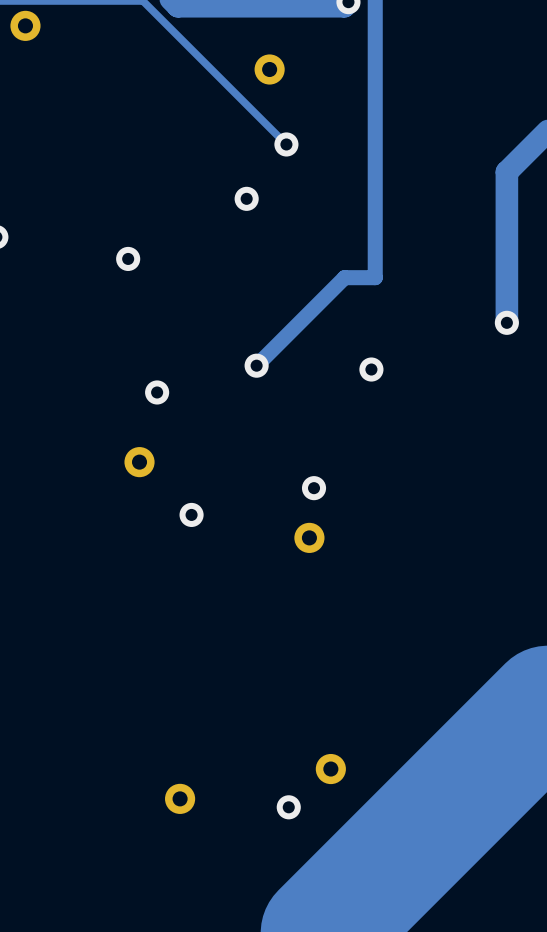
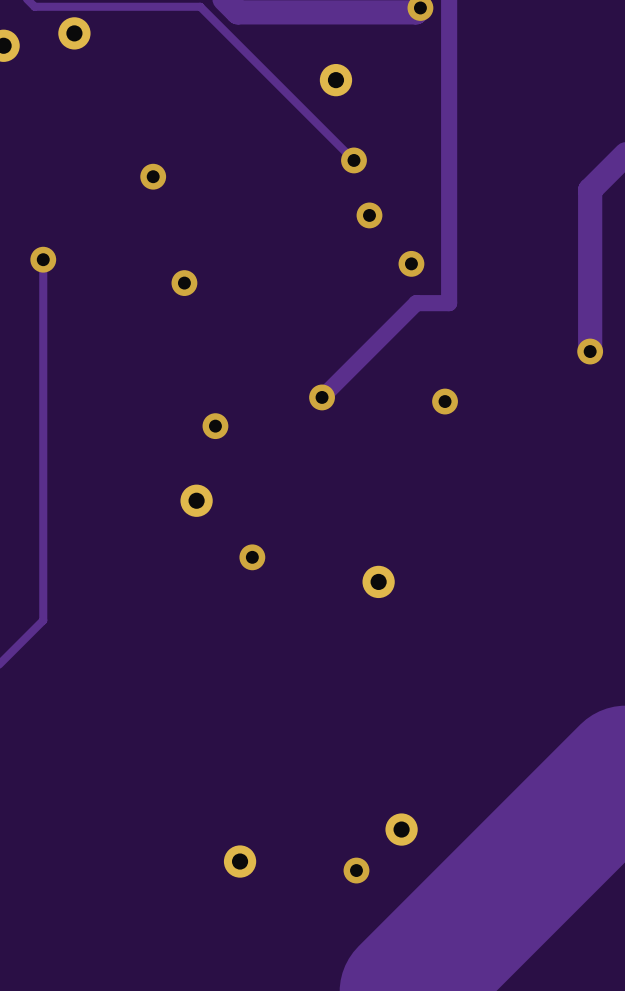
via: none -> (153, 176)
via: none -> (369, 215)
via: (246, 198) -> none
via: none -> (411, 263)
via: (314, 488) -> none

